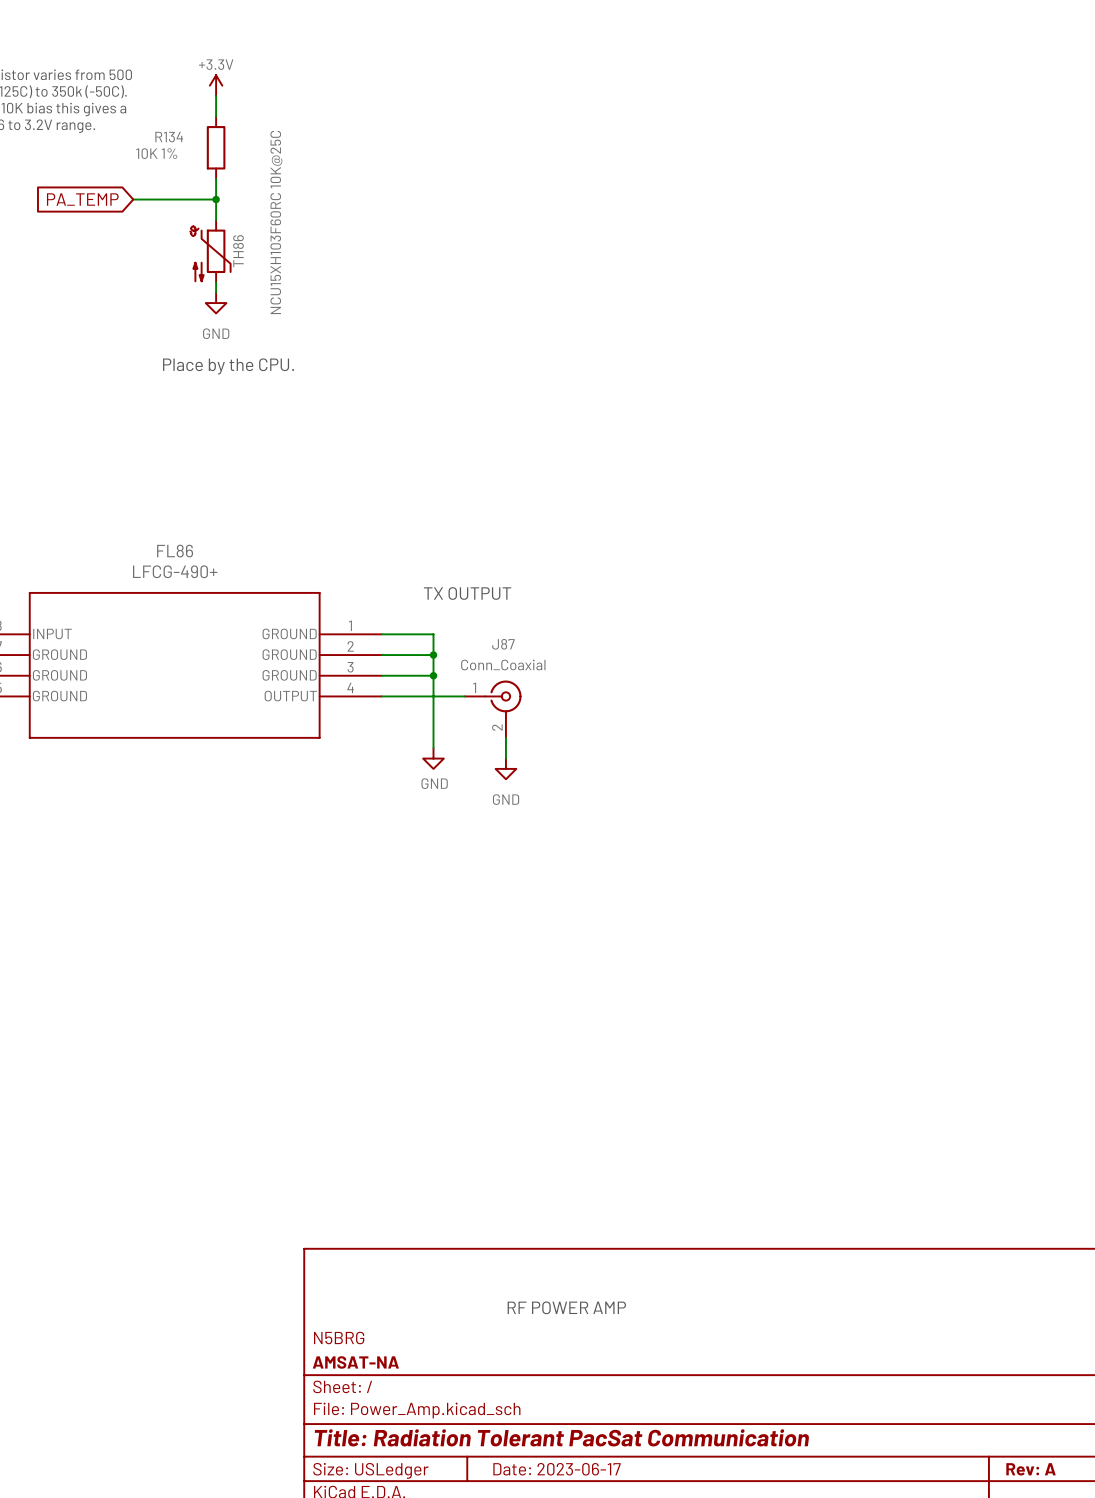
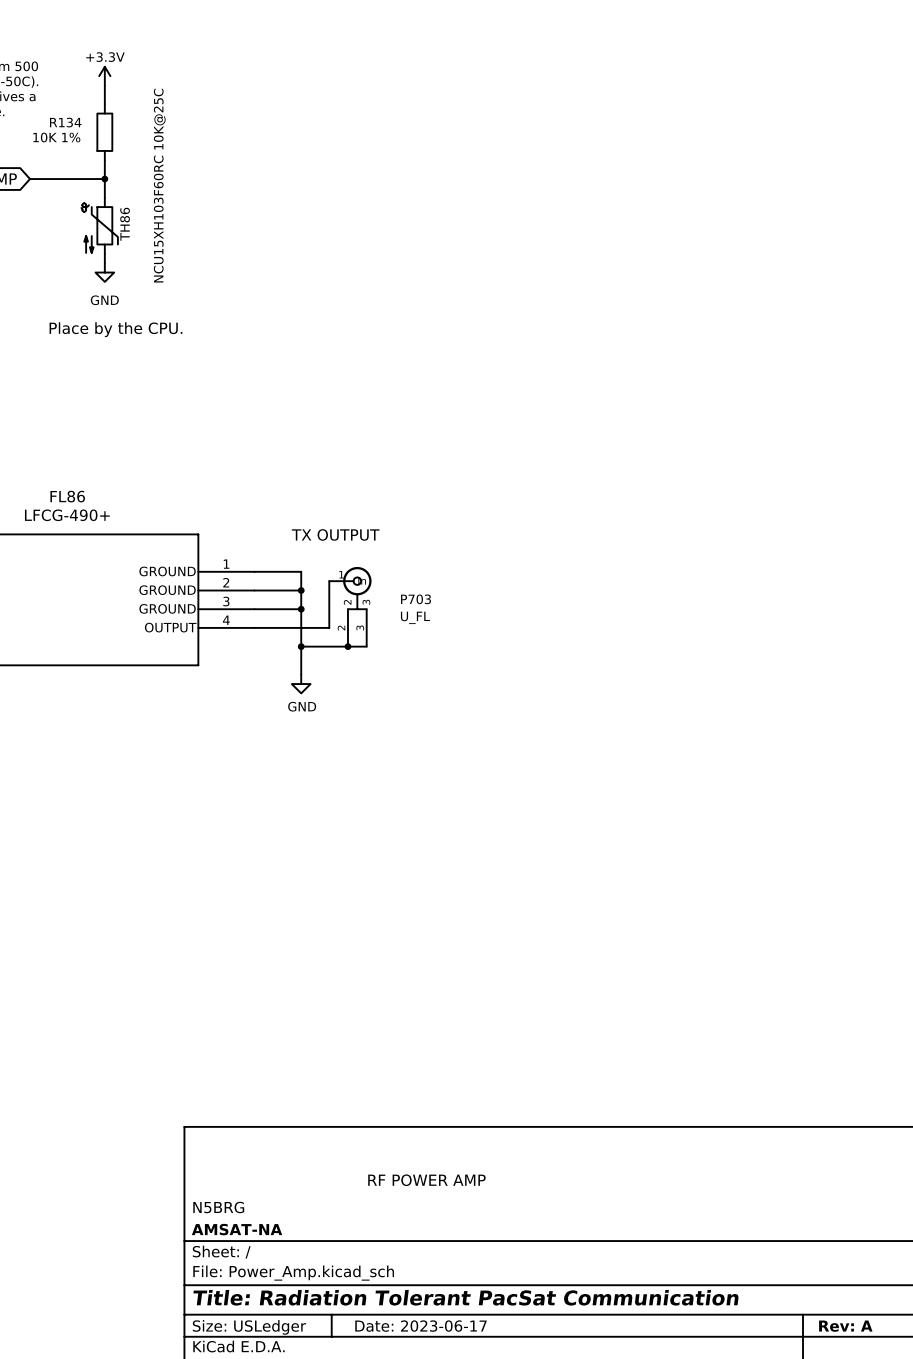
wire: none -> (329, 581) (329, 627)
P703: none -> U_FL (350, 606)
J87: Conn_Coaxial (493, 709) -> none
wire: none -> (301, 646) (366, 646)
junction: none -> (301, 646)
junction: none -> (347, 646)
wire: (505, 737) (505, 758) -> none
power symbol: GND (505, 768) -> none

